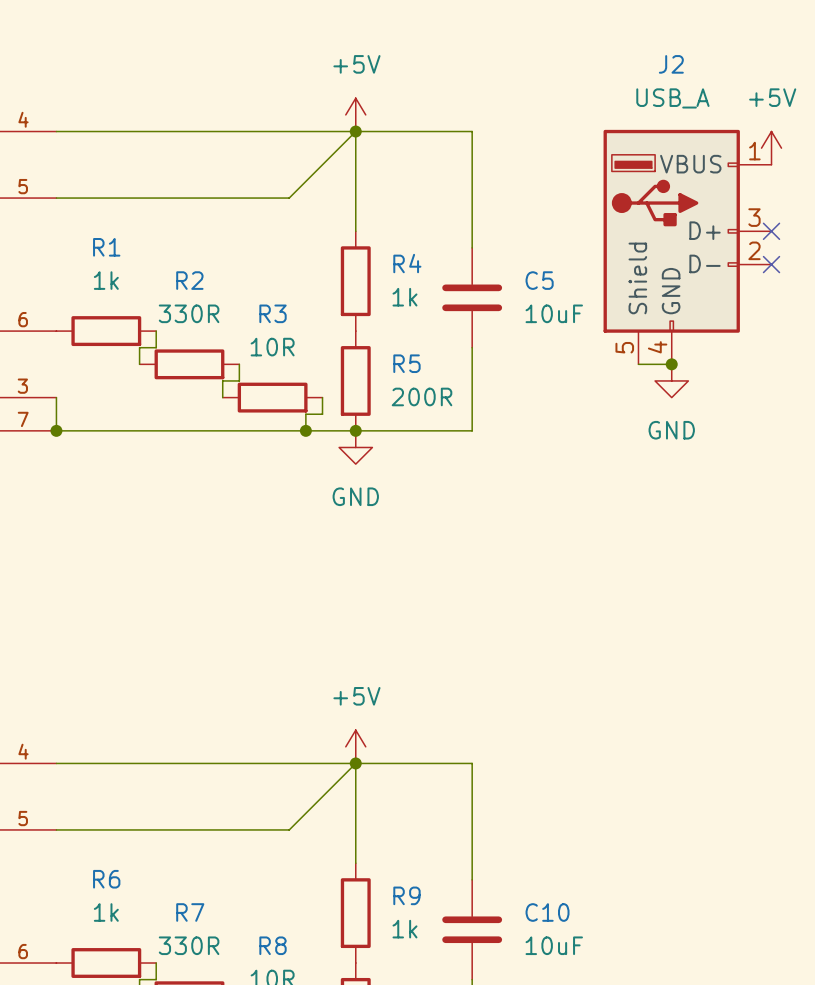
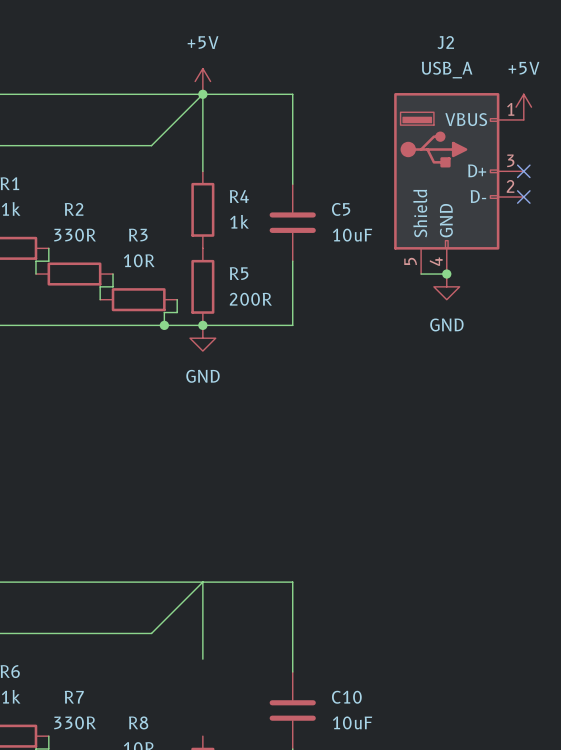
power symbol: +5V (355, 746) -> none
junction: (355, 763) -> none
R9: 1k (355, 913) -> none

